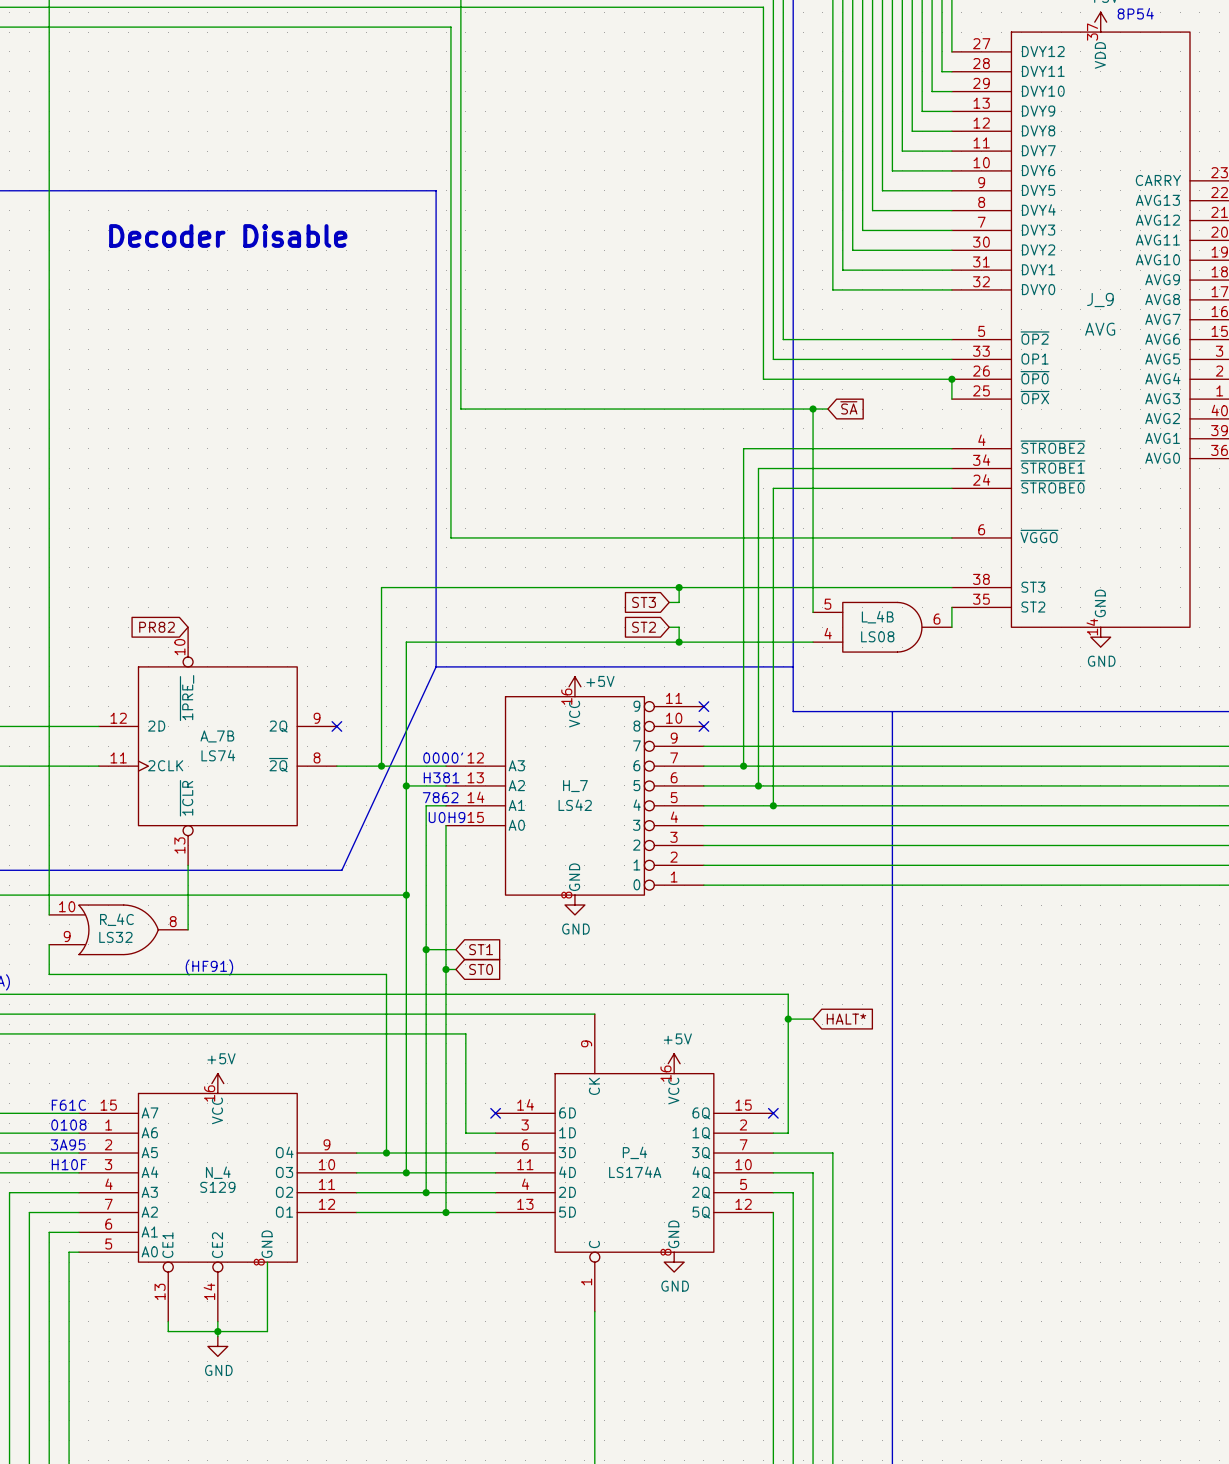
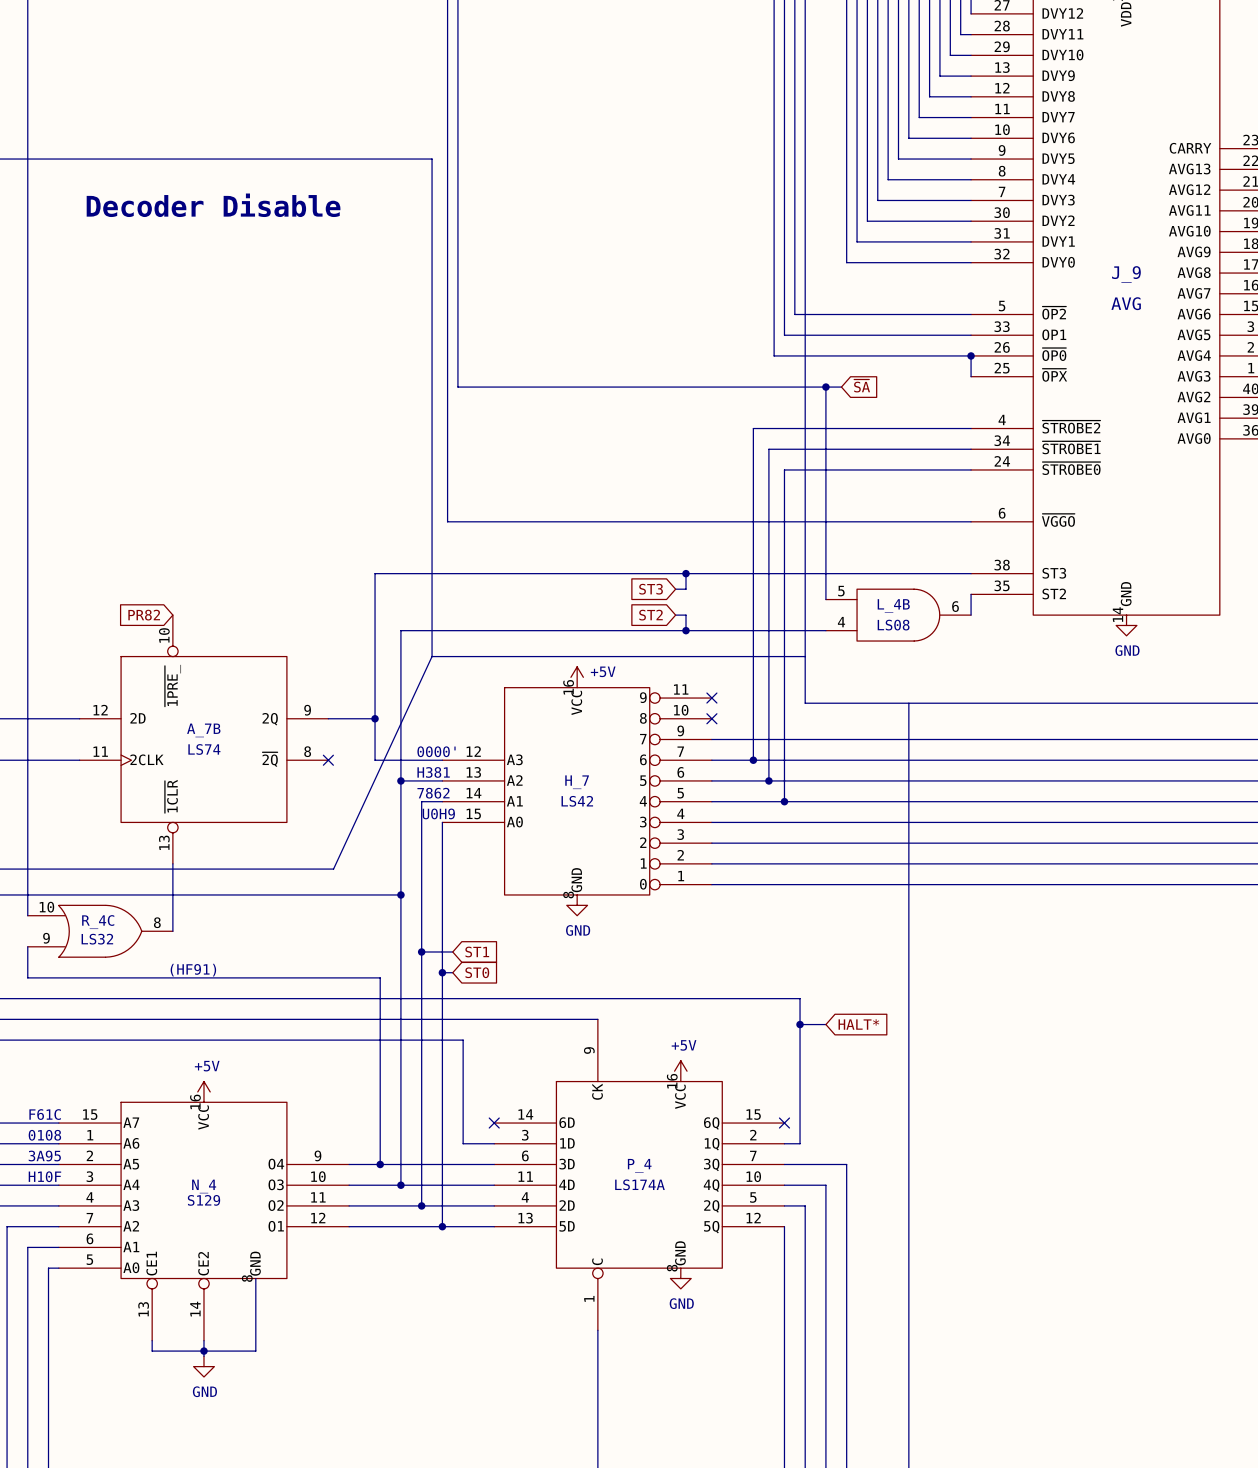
no-connect mark position: (336, 726) -> (328, 760)
wire: (336, 766) (381, 766) -> (328, 718) (375, 718)
junction position: (381, 766) -> (375, 718)

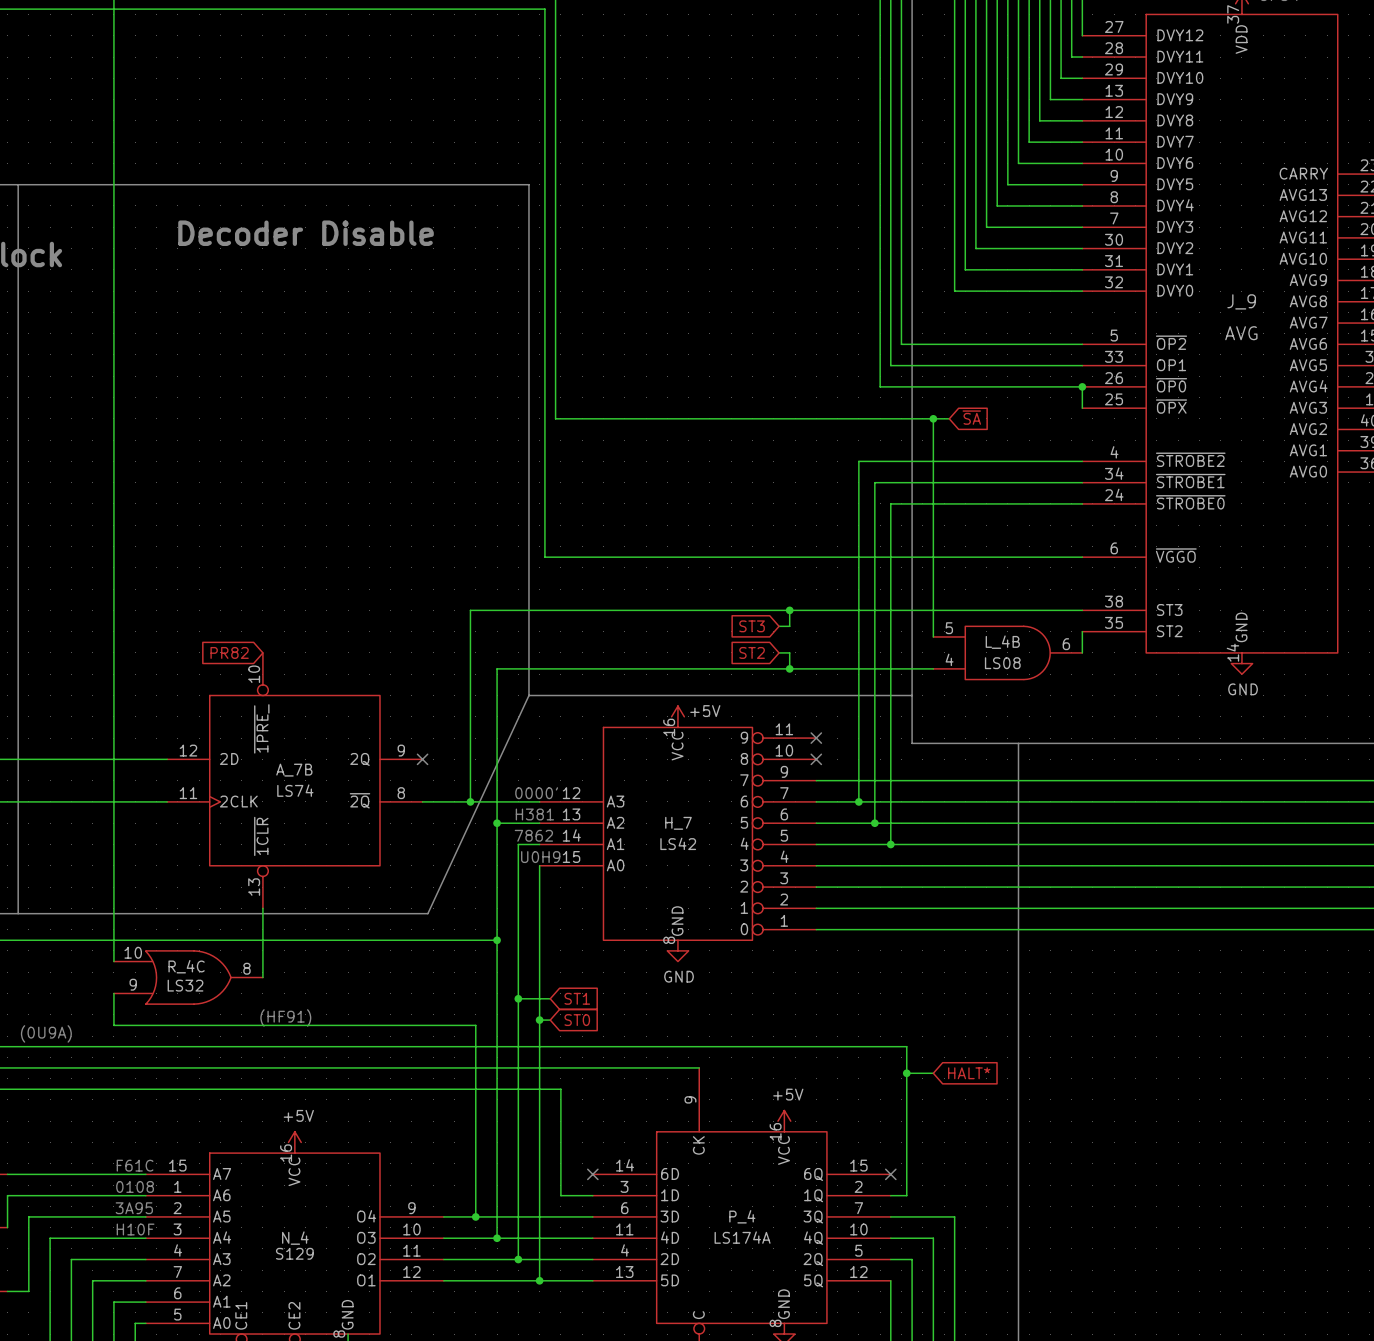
wire: (328, 718) (375, 718) -> (422, 801) (470, 801)
junction position: (375, 718) -> (470, 801)
no-connect mark position: (328, 760) -> (422, 759)

